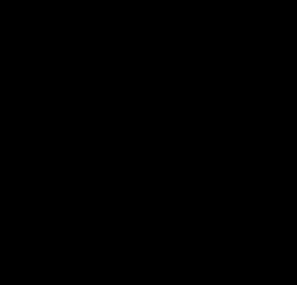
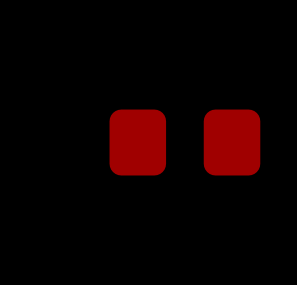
part: none -> (184, 142)

